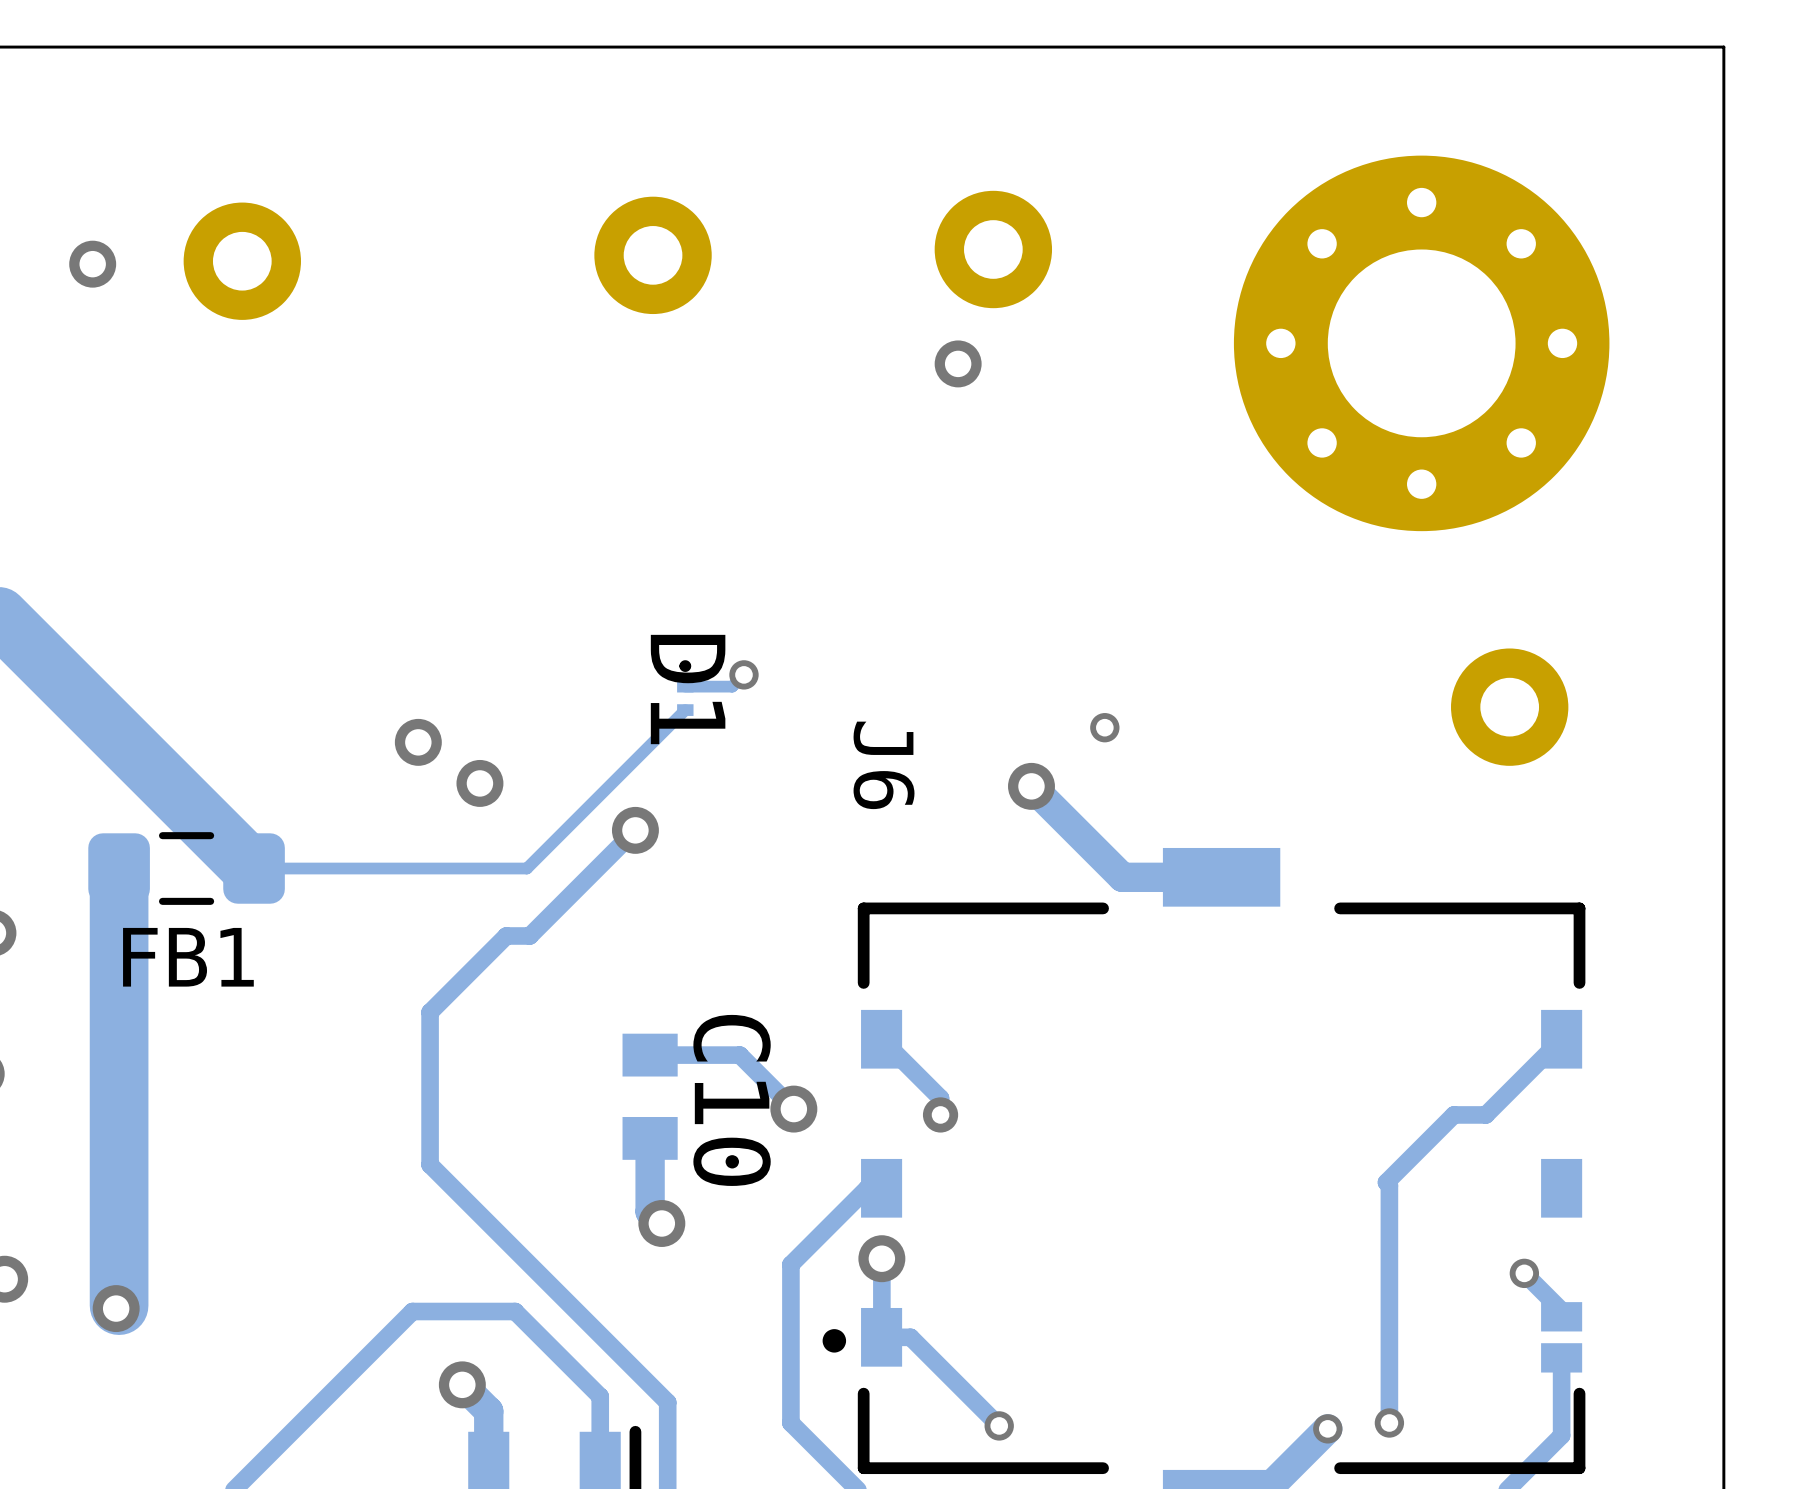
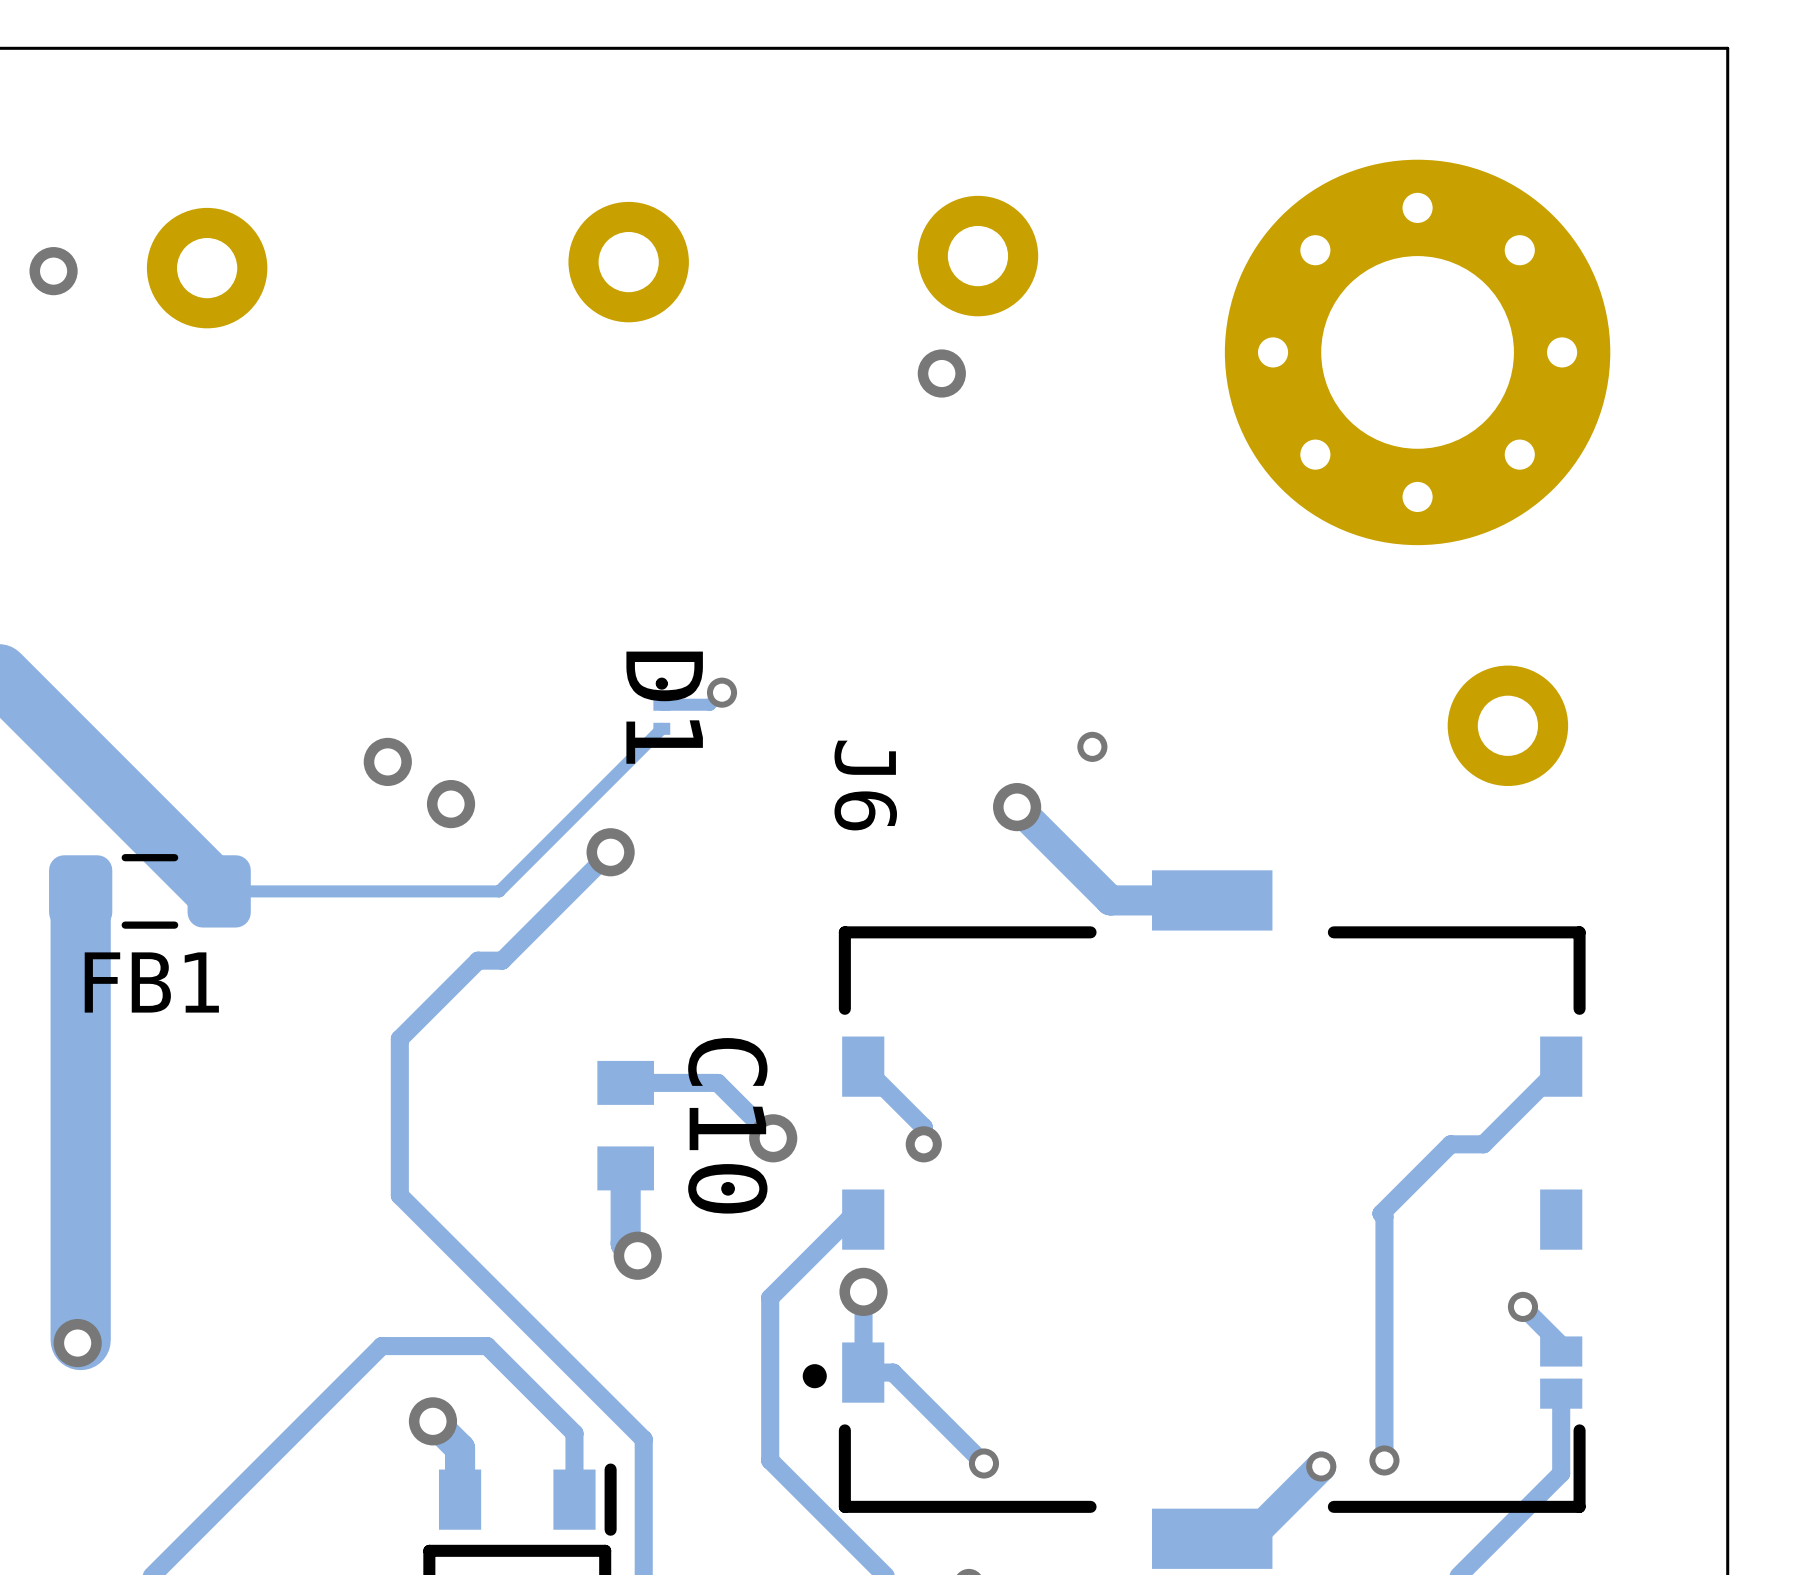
C10 name position: C10 (732, 1100) -> C10 (727, 1125)

